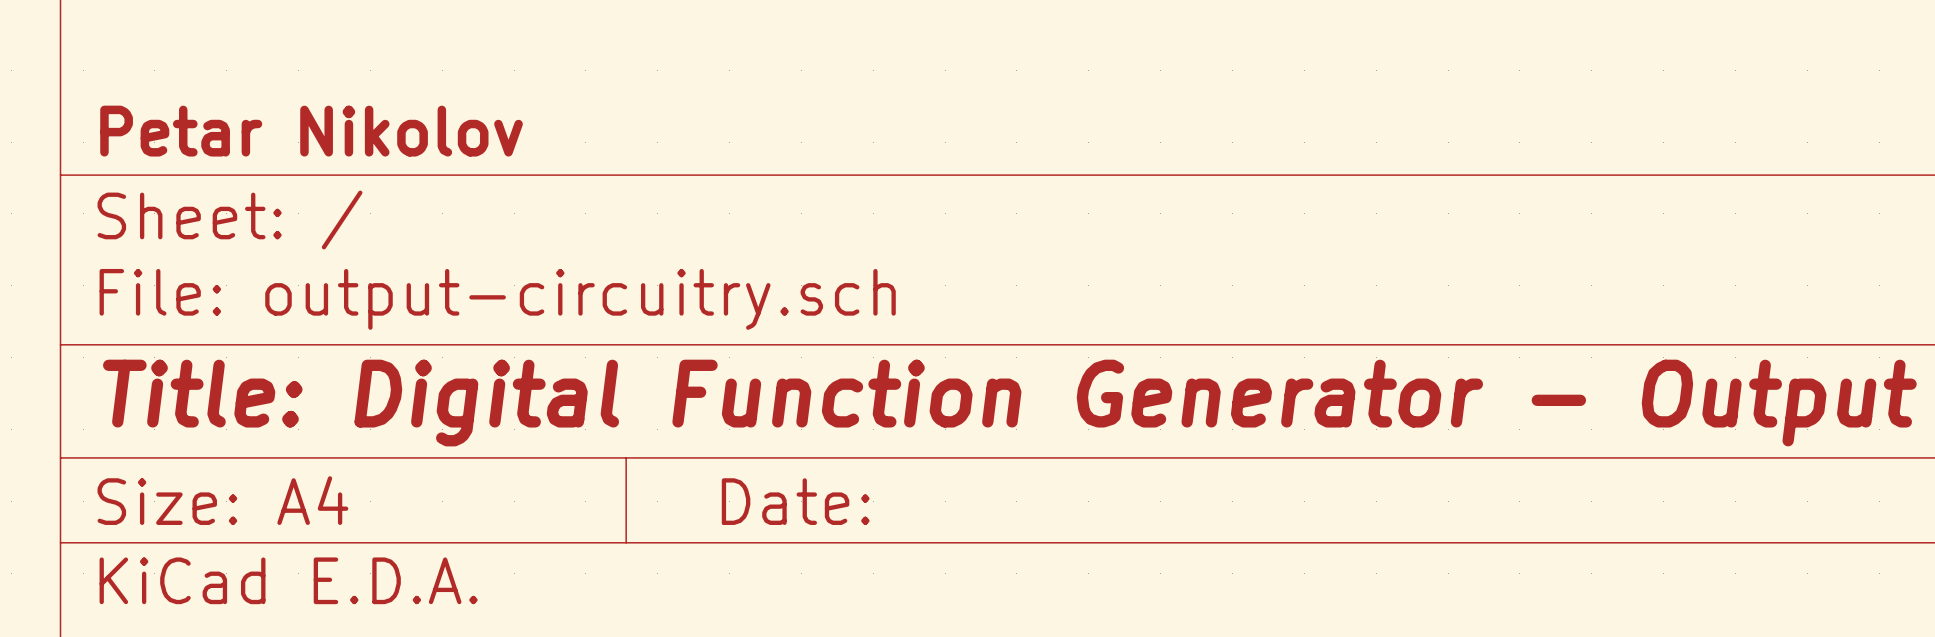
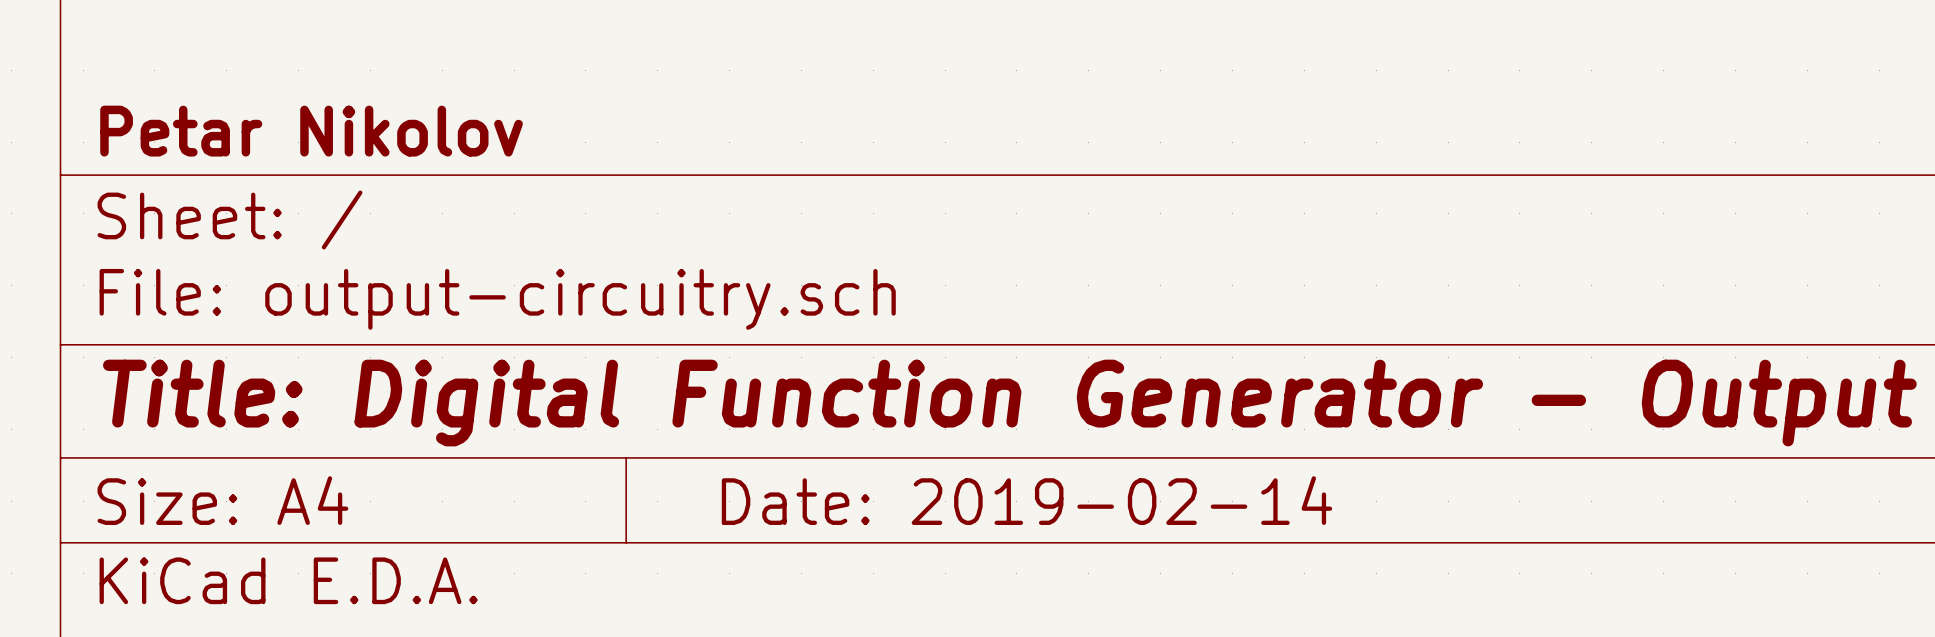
title block: Date: (795, 501) -> Date: 2019-02-14 (1026, 500)

